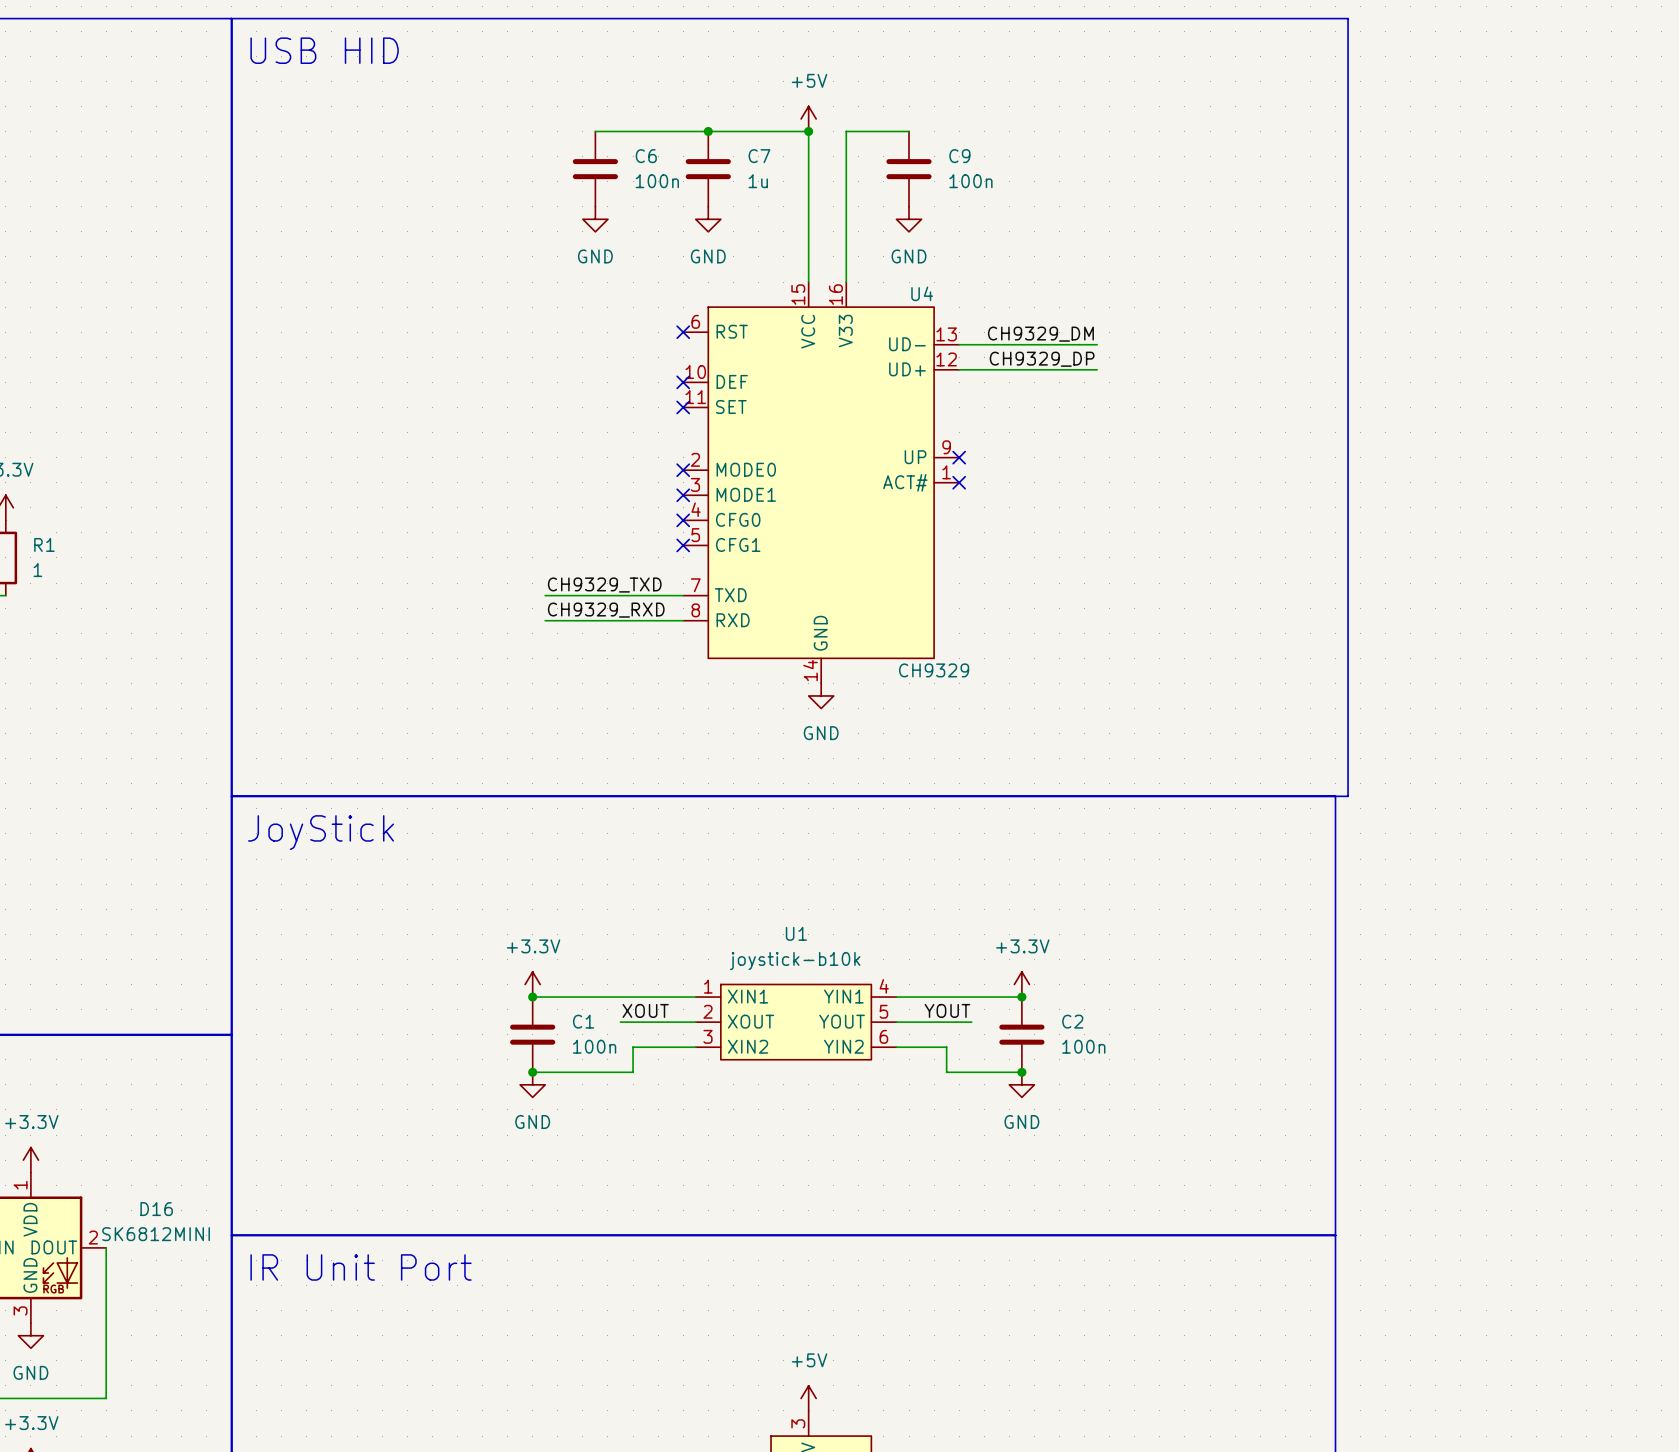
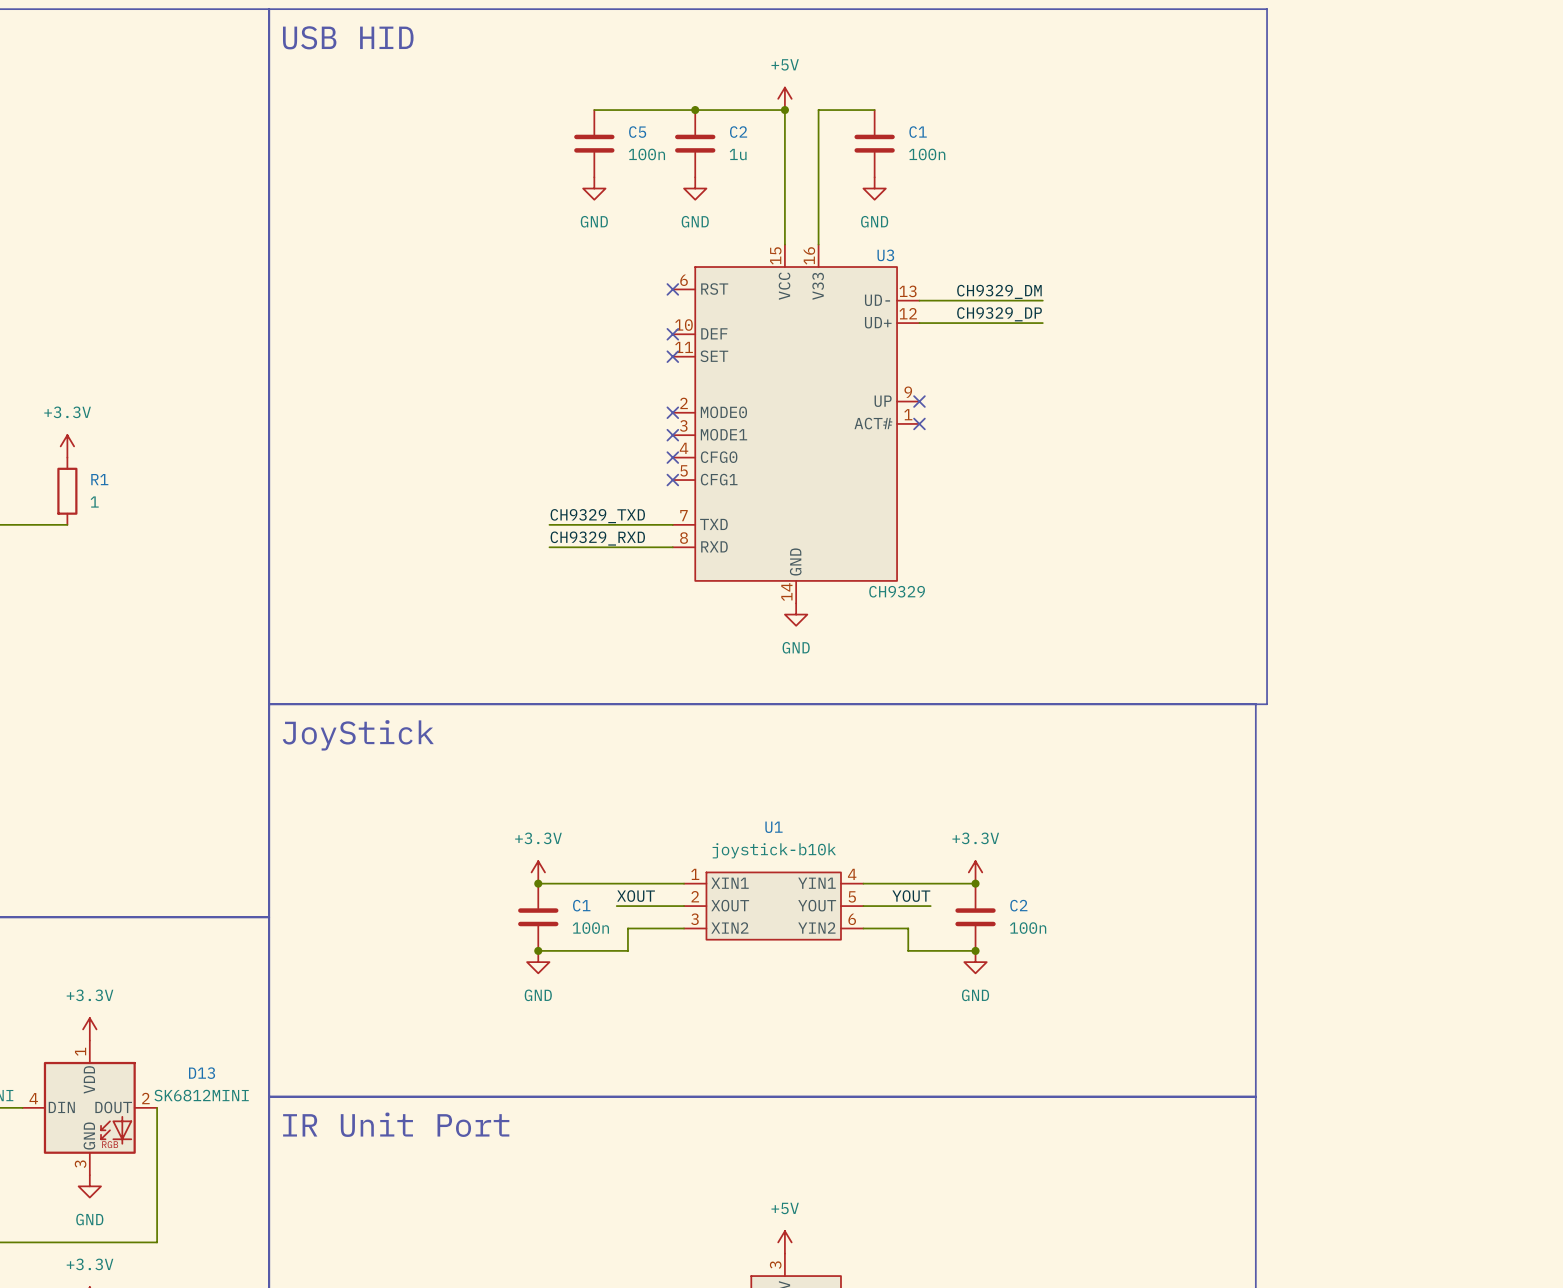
C6 name: C6 (646, 156) -> C5 (637, 132)
C7 name: C7 (759, 156) -> C2 (738, 132)
C9 name: C9 (959, 156) -> C1 (918, 132)
U4 name: U4 (922, 293) -> U3 (885, 255)
D16 name: D16 (156, 1209) -> D13 (202, 1073)

